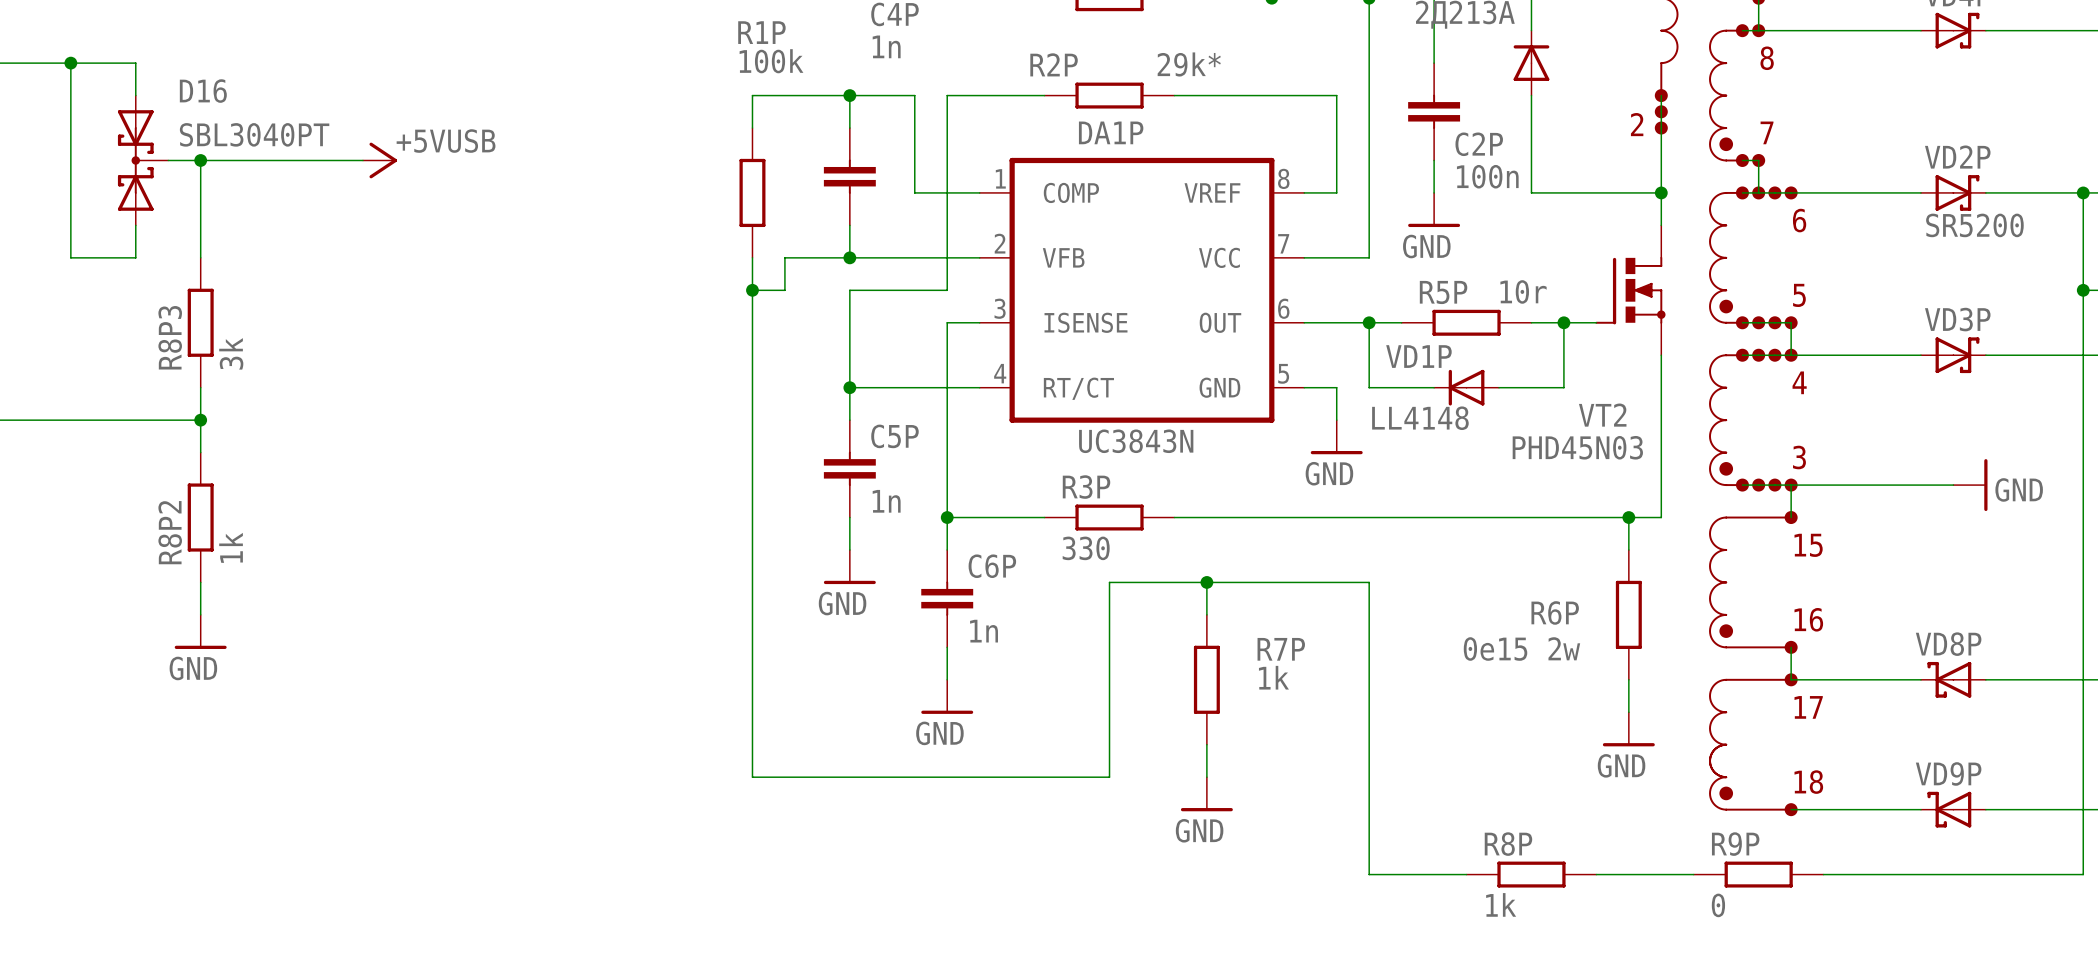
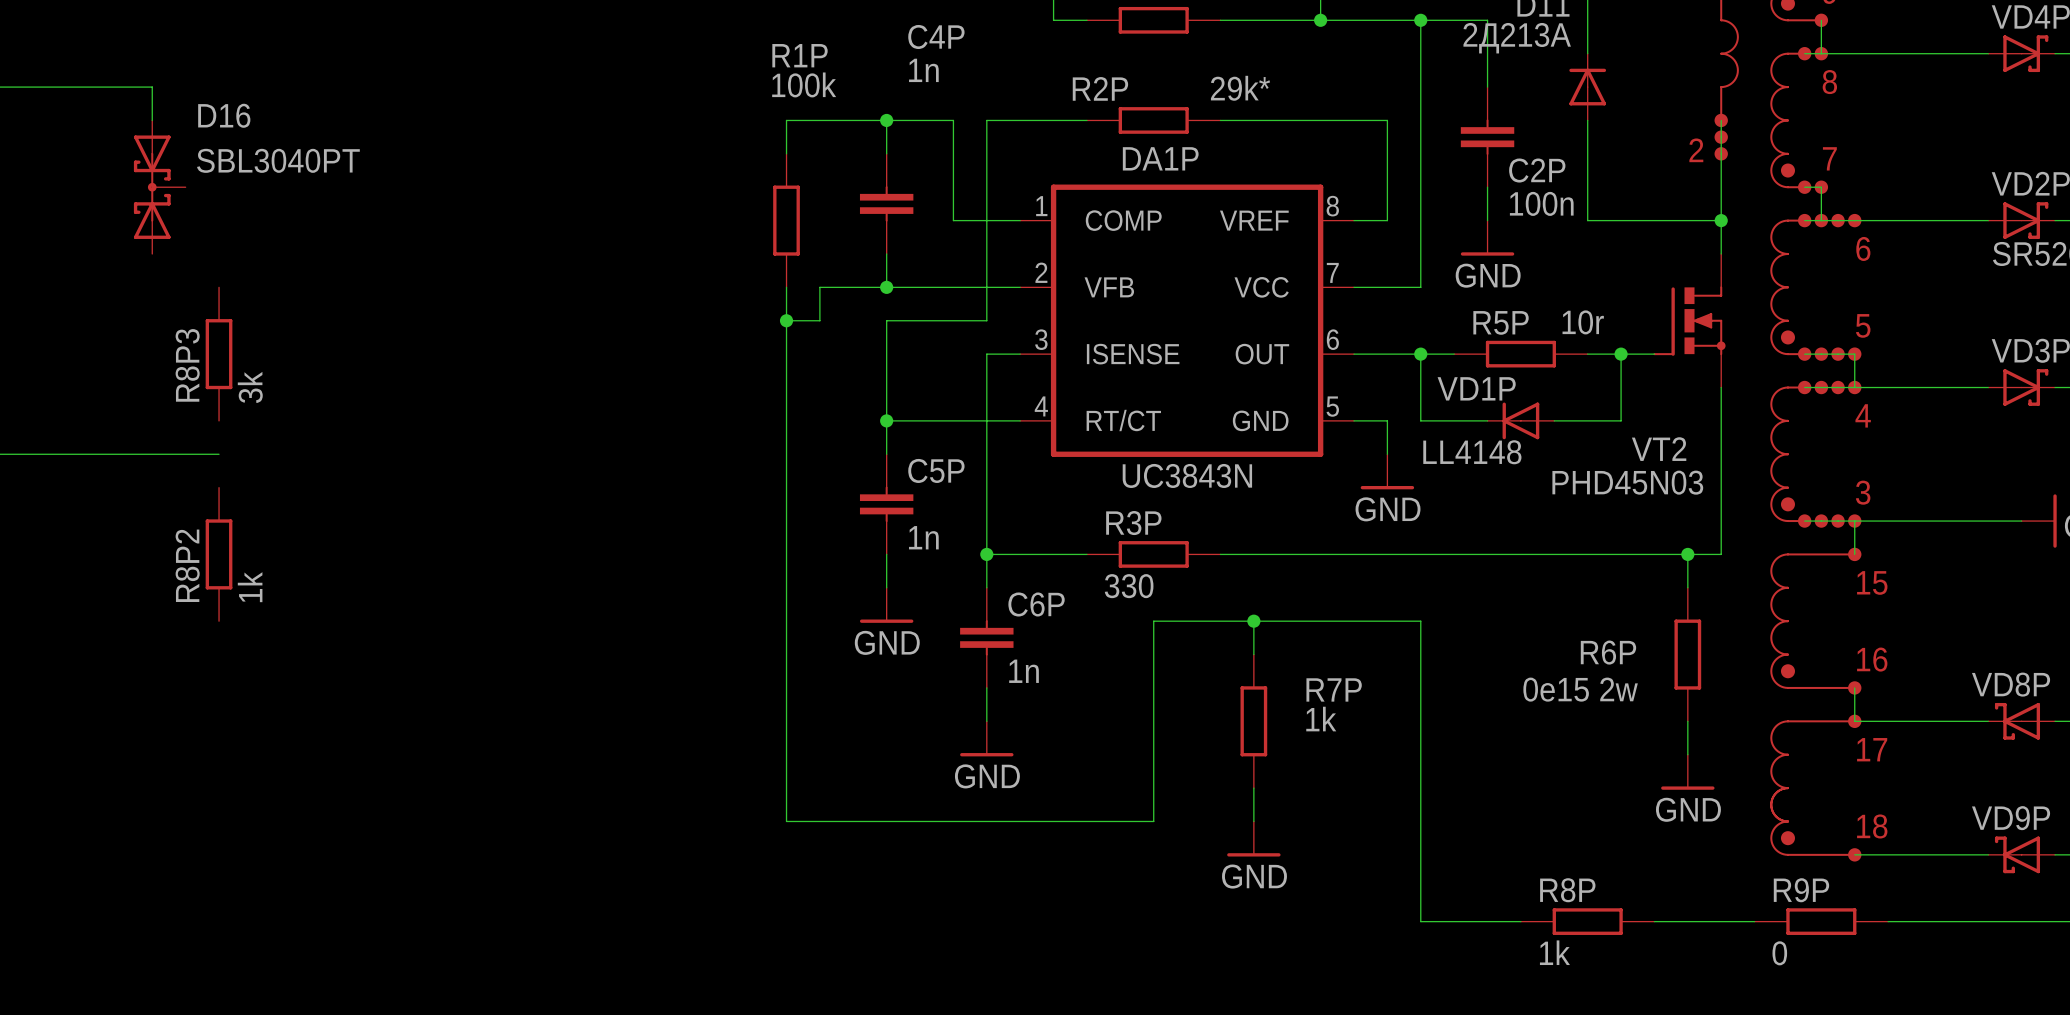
wire: (70, 63) (70, 257) (135, 257) (135, 225) -> none
junction: (70, 63) -> none
wire: (168, 160) (362, 160) -> none
wire: (200, 160) (200, 257) -> none
junction: (200, 160) -> none
power symbol: +5VUSB (380, 160) -> none
wire: (200, 387) (200, 452) -> none
junction: (200, 420) -> none
wire: (200, 582) (200, 614) -> none
power symbol: GND (200, 631) -> none

